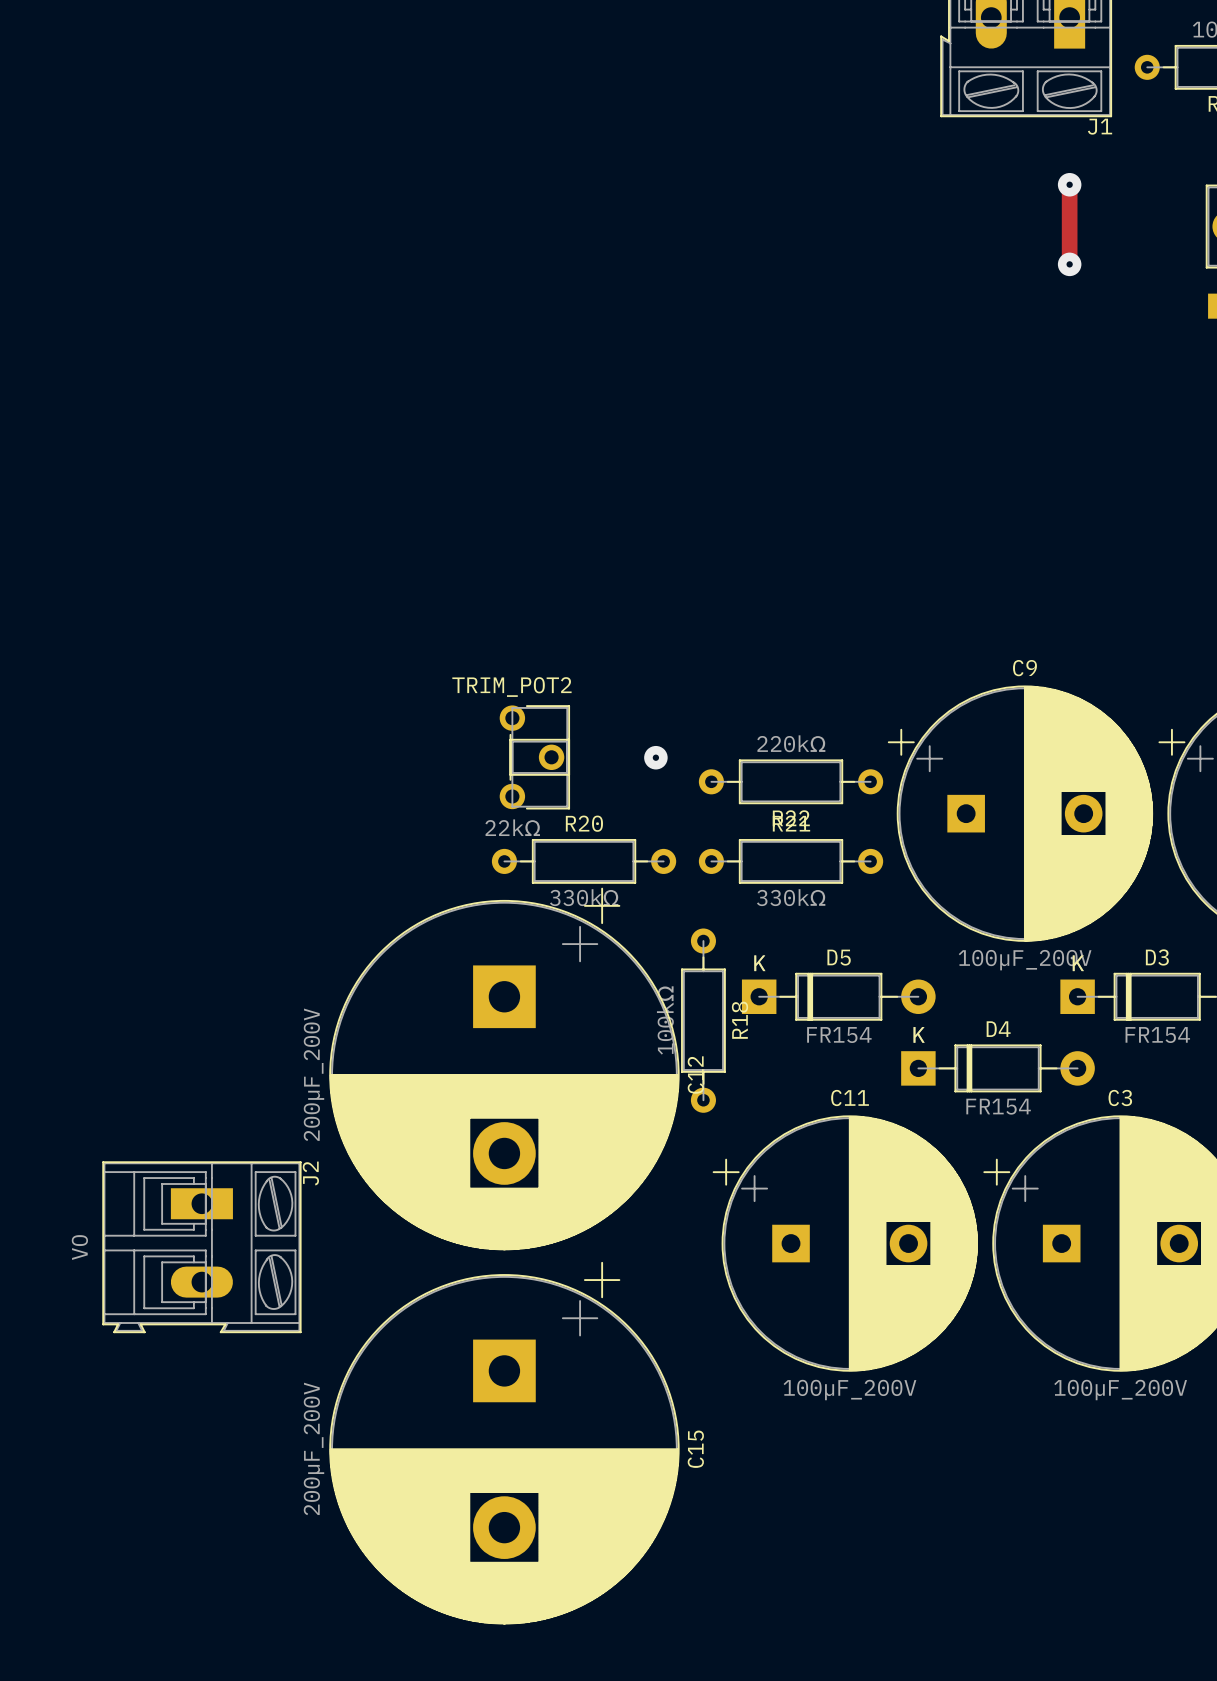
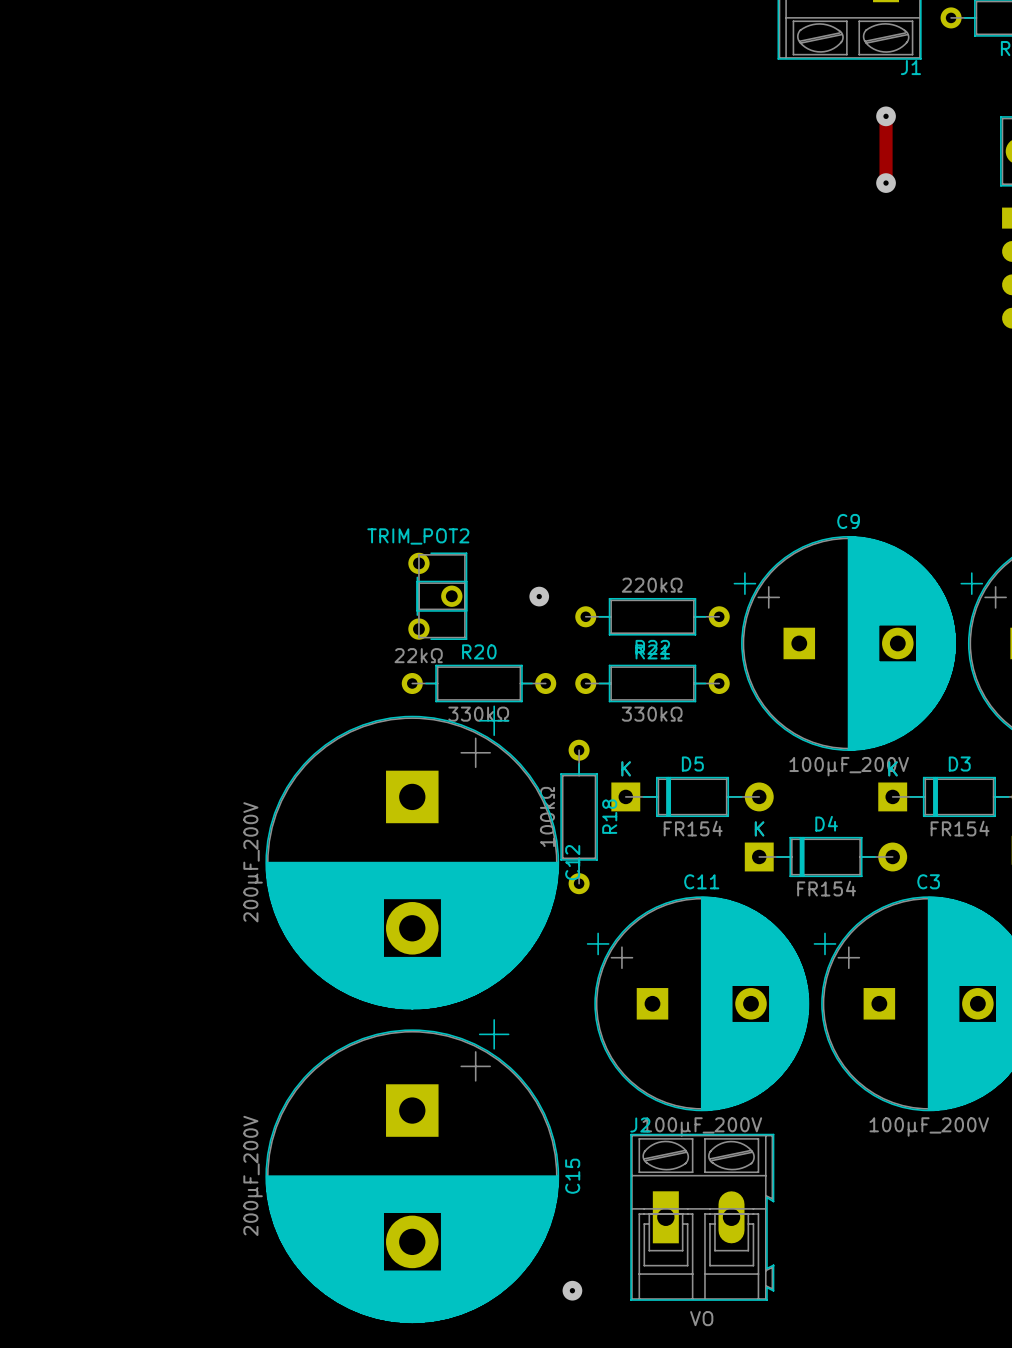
J2 rotation: 0° (201, 1247) -> 90° counterclockwise (702, 1217)
J2 position: (201, 1247) -> (702, 1217)
via: none -> (572, 1290)

